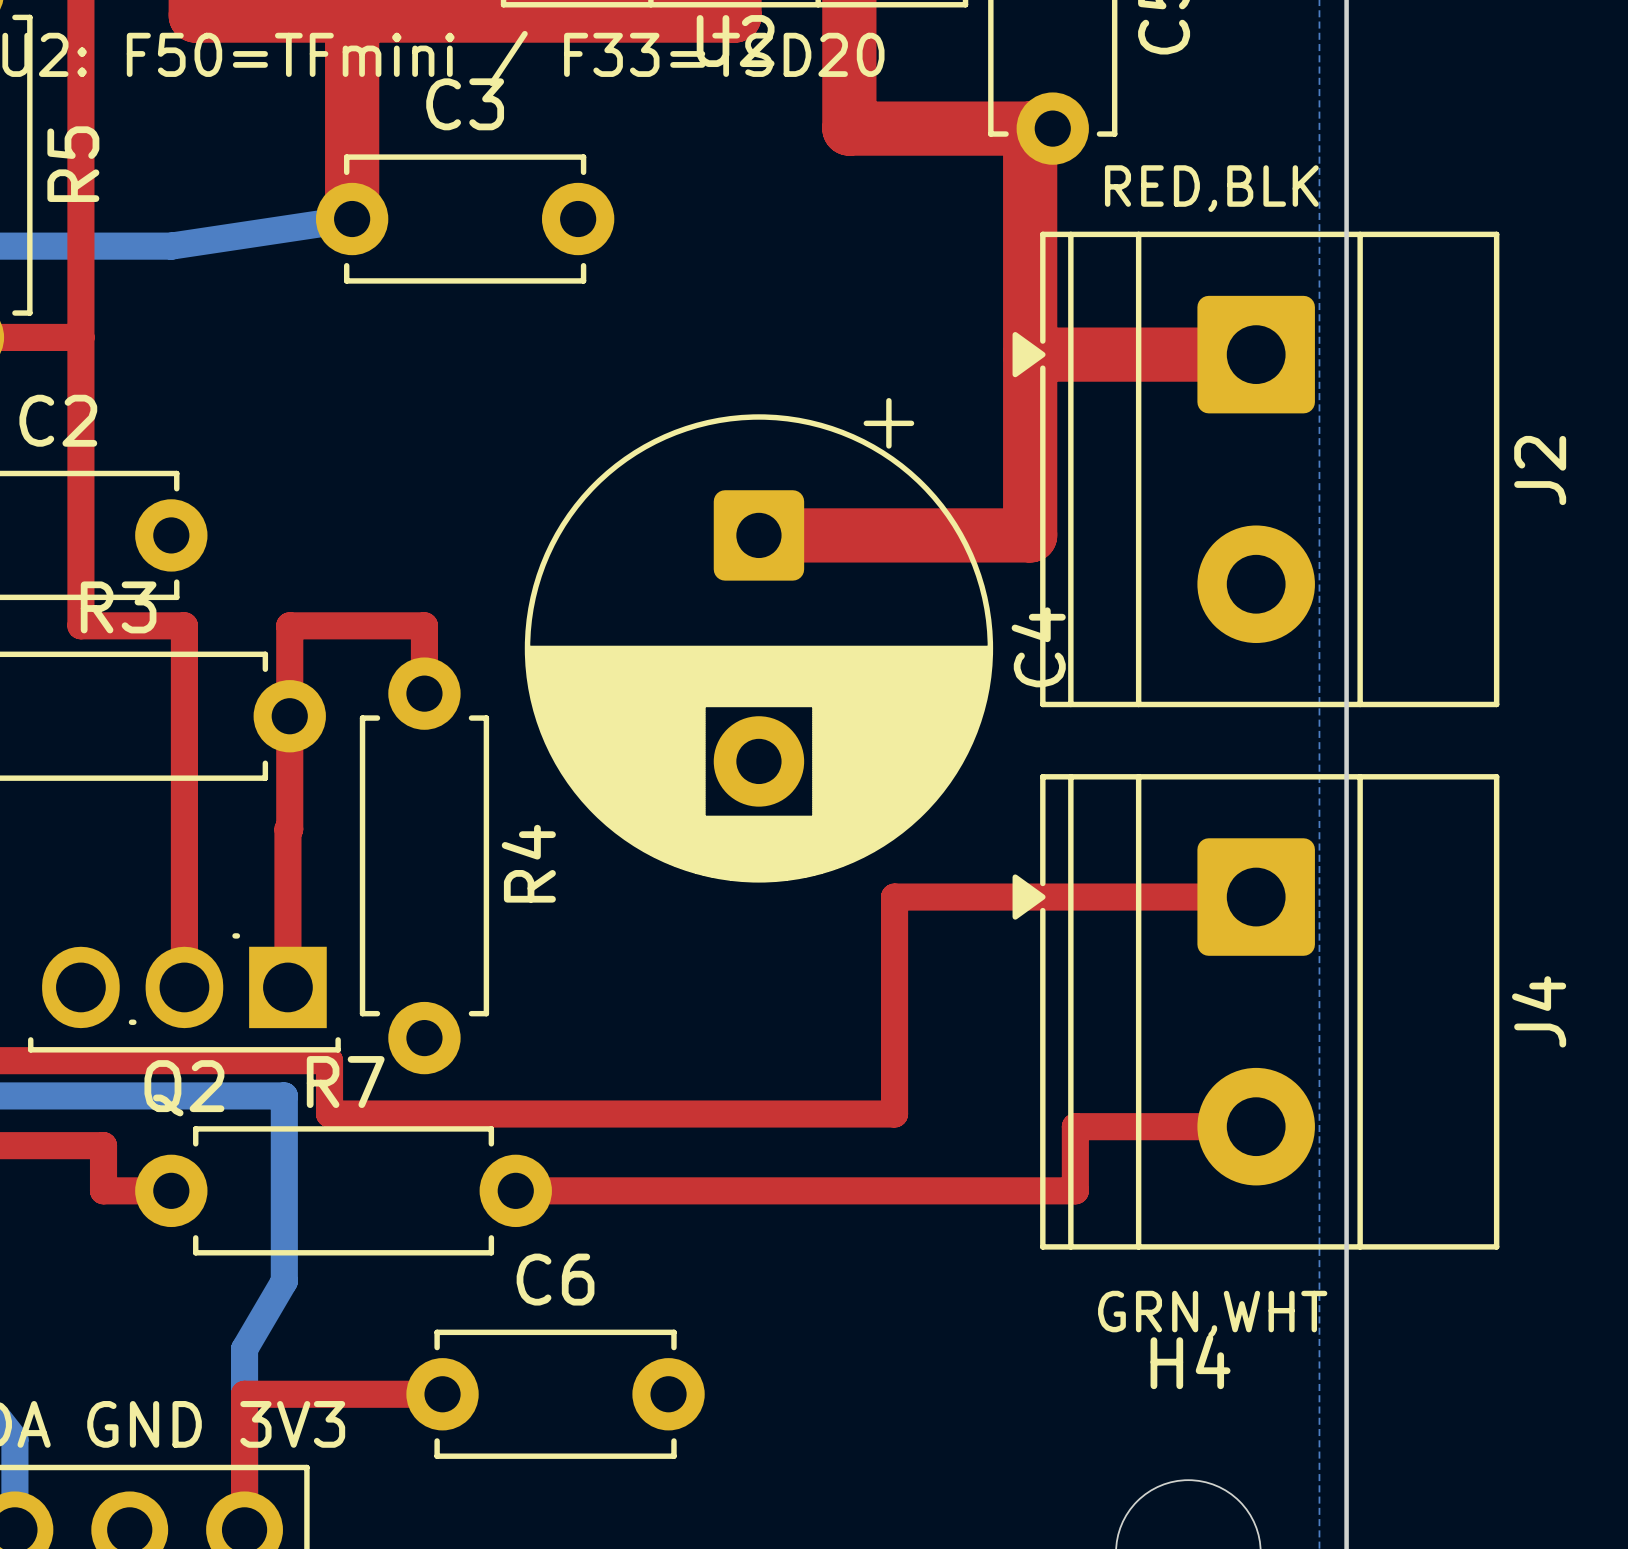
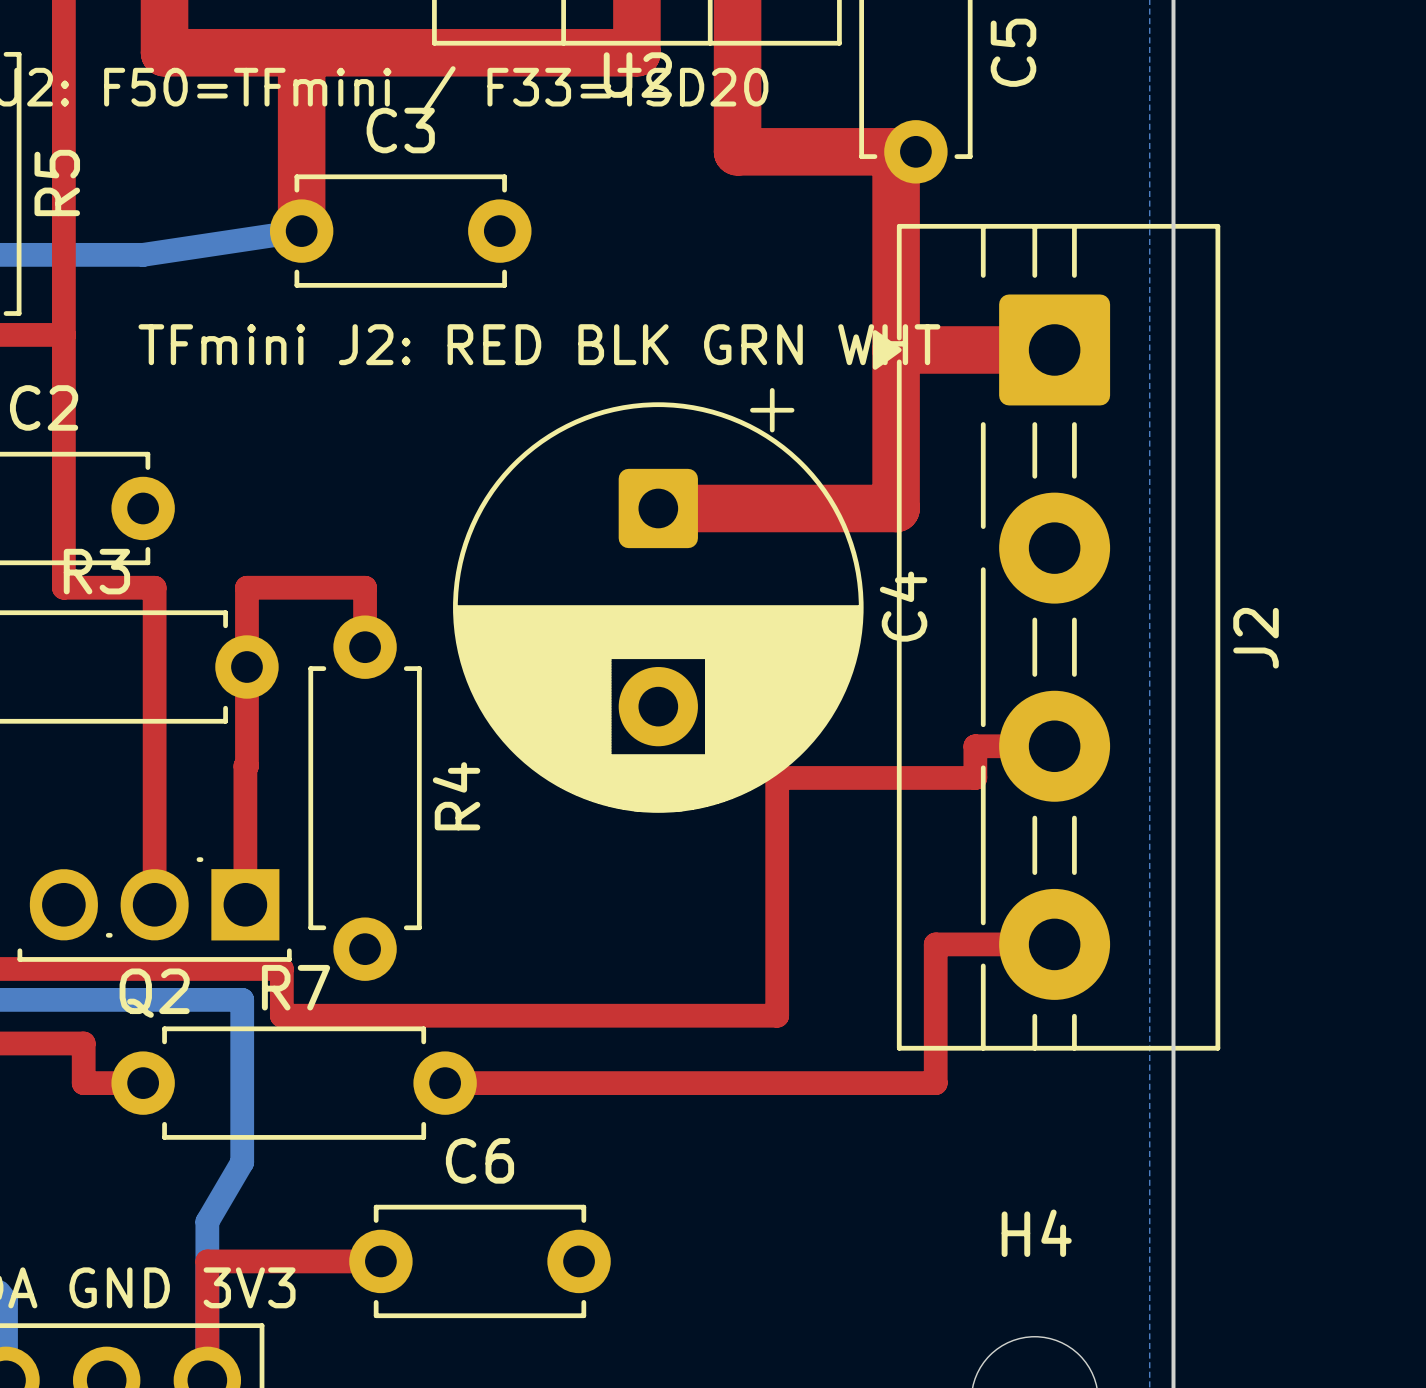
text: RED,BLK (1211, 188) -> none
J2 footprint: [1012, 231, 1500, 708] -> [872, 223, 1221, 1051]
text: none -> TFmini J2: RED BLK GRN WHT (539, 344)
top track: (894, 897) (1256, 897) -> (777, 825) (777, 777) (975, 777) (975, 746) (1054, 746)
J4: (1255, 1011) -> none
top track: (1075, 1126) (1256, 1126) -> (935, 1026) (935, 944) (1054, 944)
text: GRN,WHT (1212, 1314) -> none

